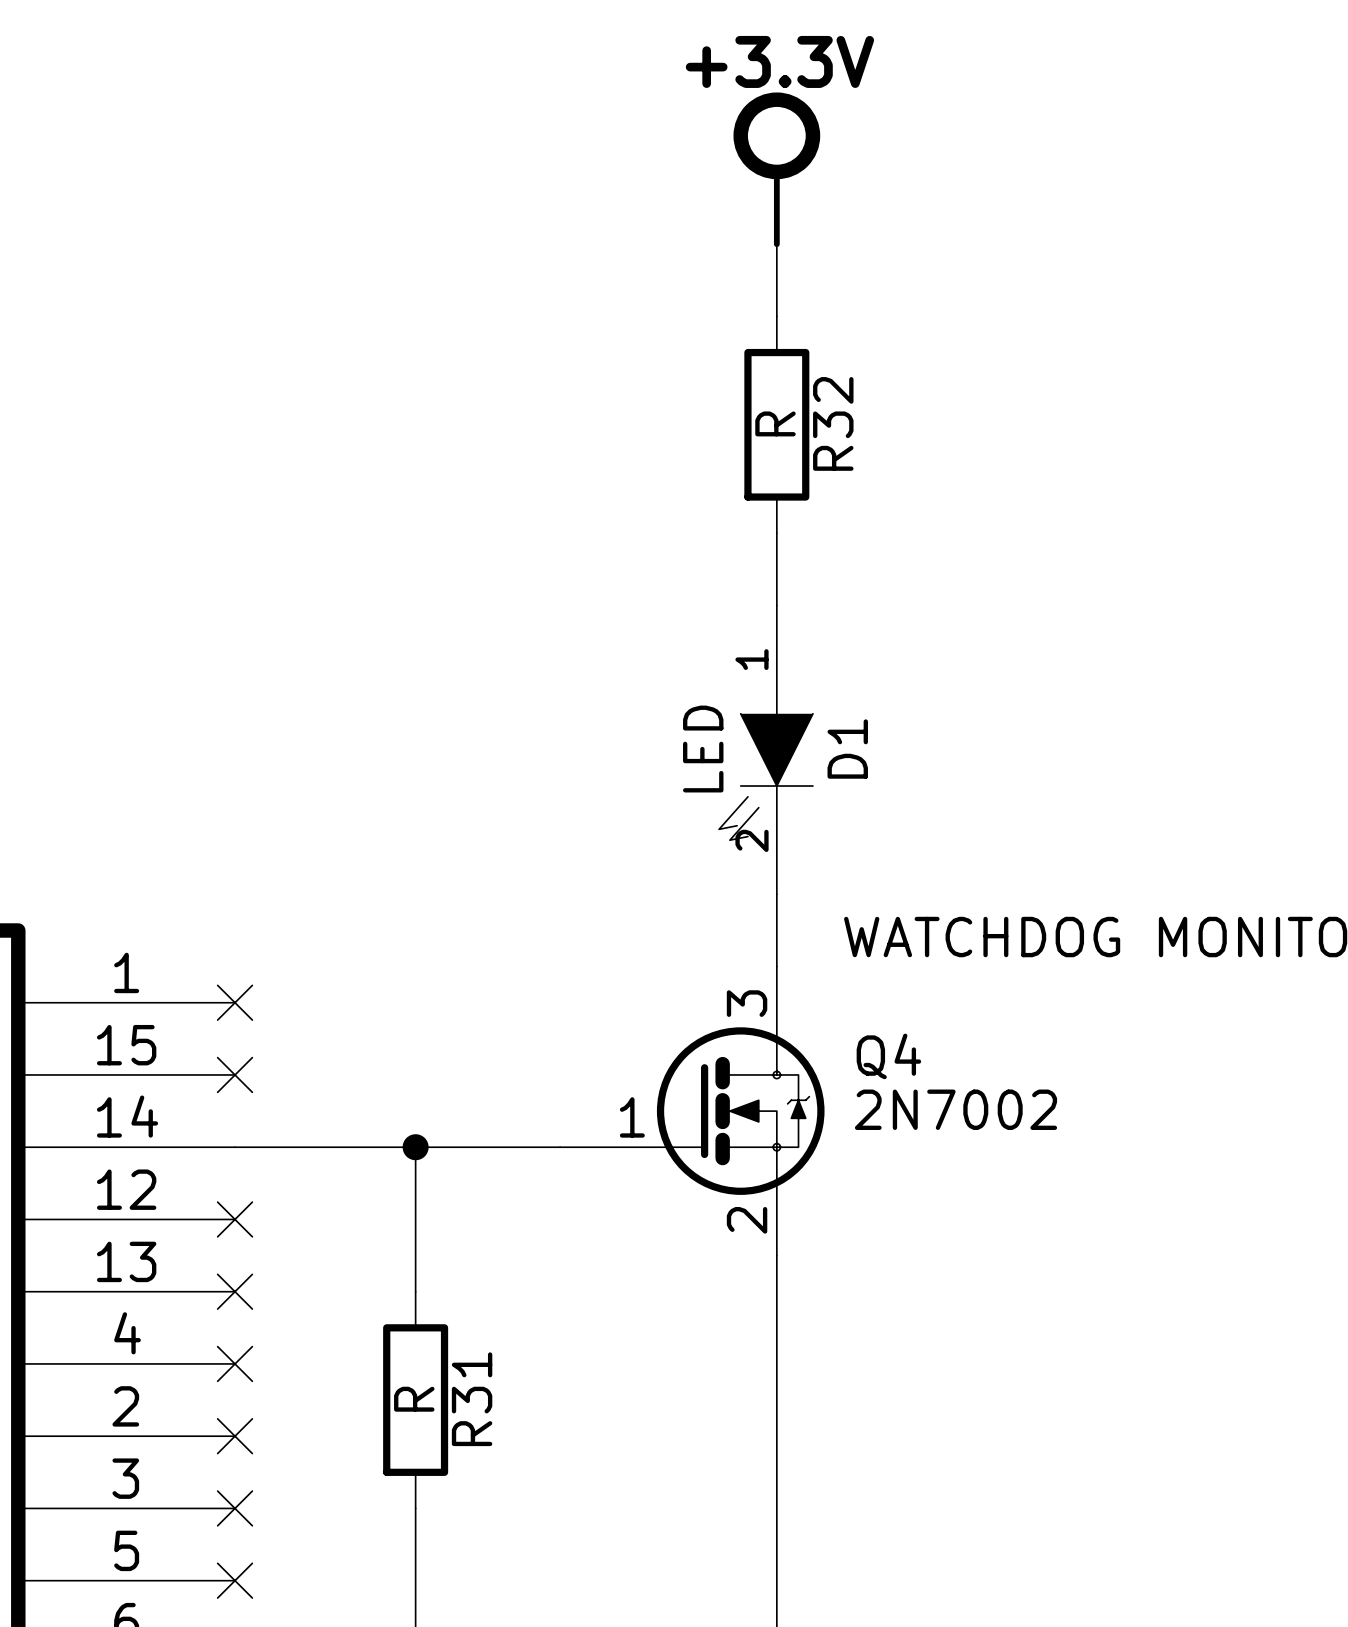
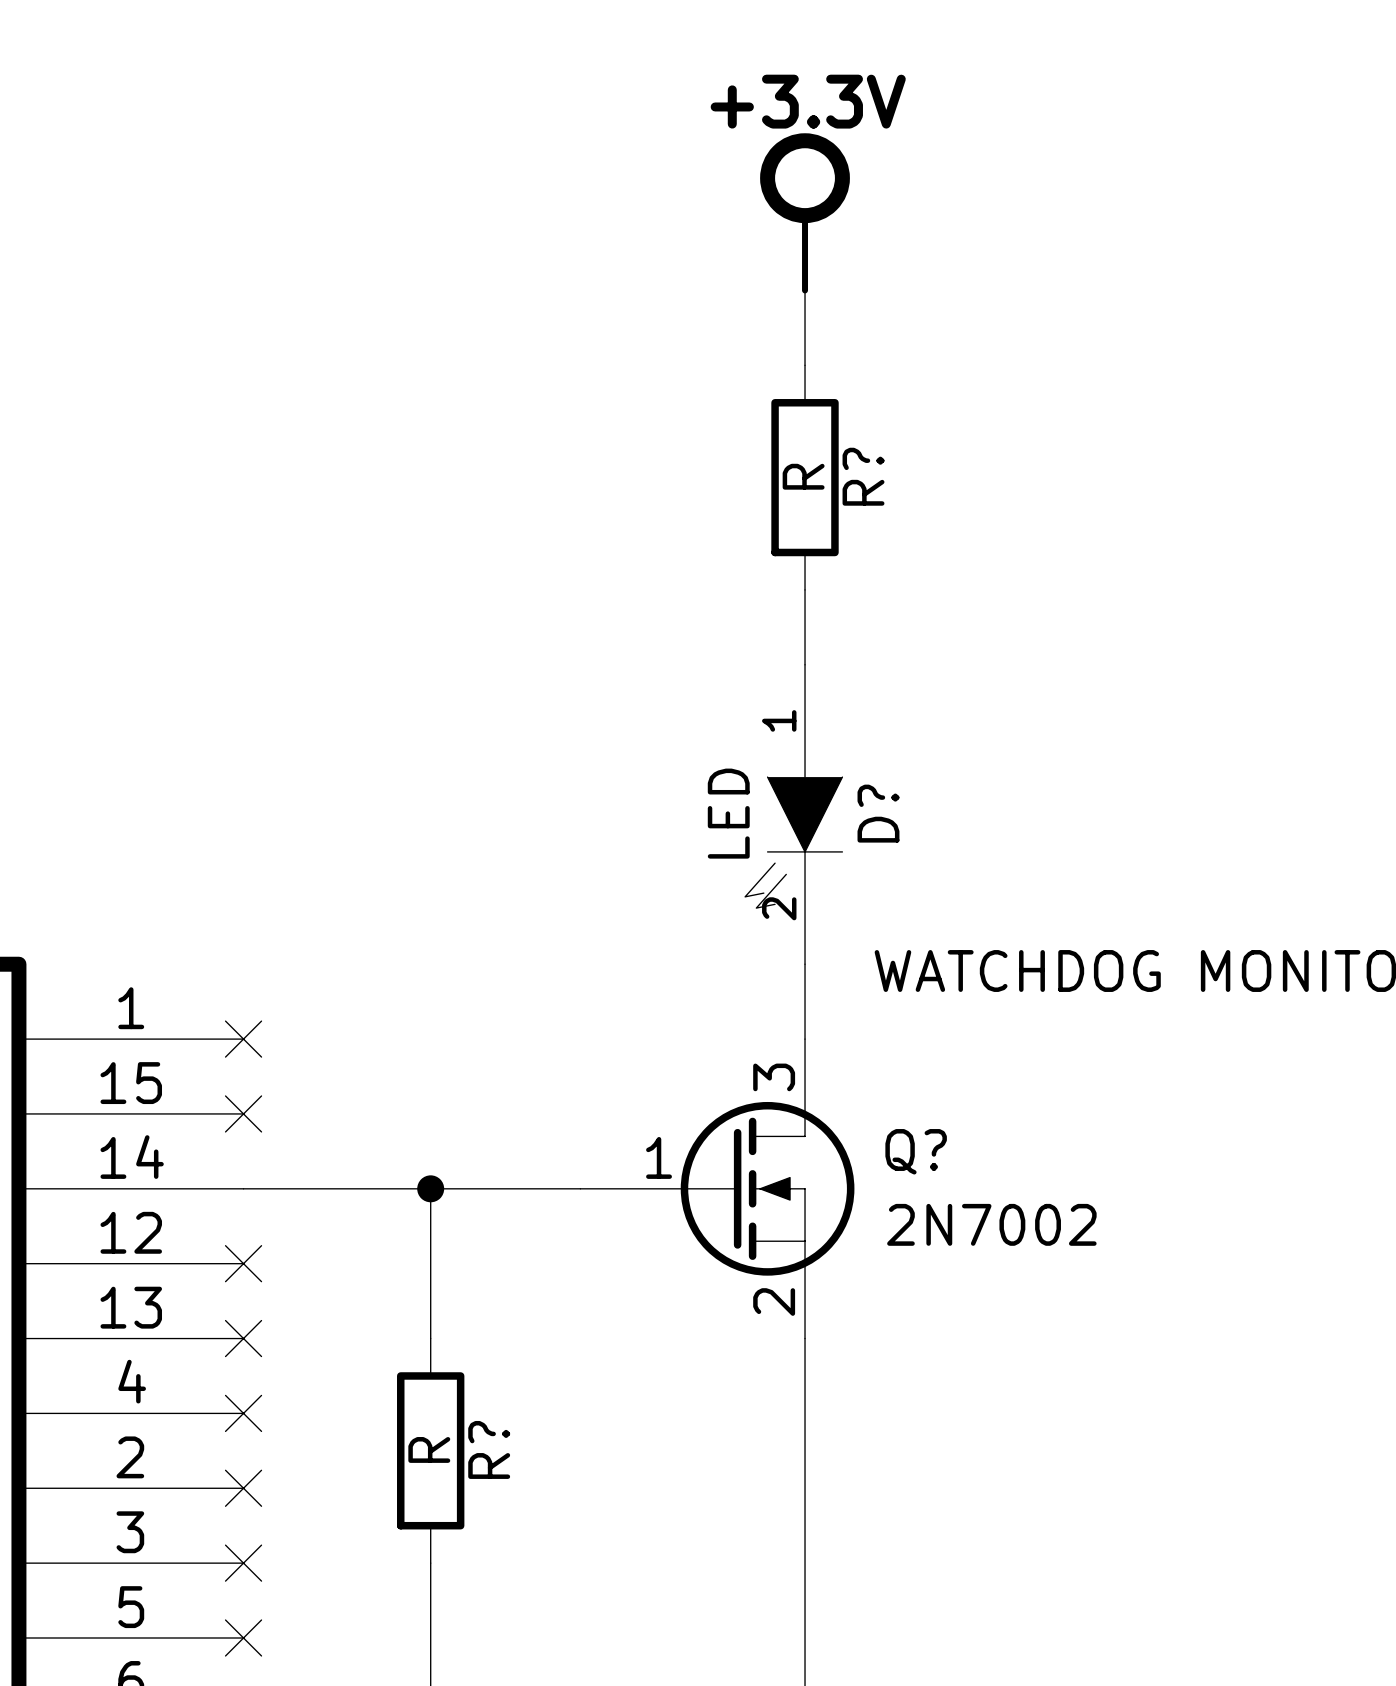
power symbol position: (776, 169) -> (805, 213)
R32: R (776, 424) -> none
R?: none -> R (805, 477)
D1: LED (766, 749) -> none
D?: none -> LED (793, 814)
Q4: 2N7002 (692, 1111) -> none
Q?: none -> 2N7002 (717, 1188)
R31 name: R31 (472, 1399) -> R? (489, 1449)

